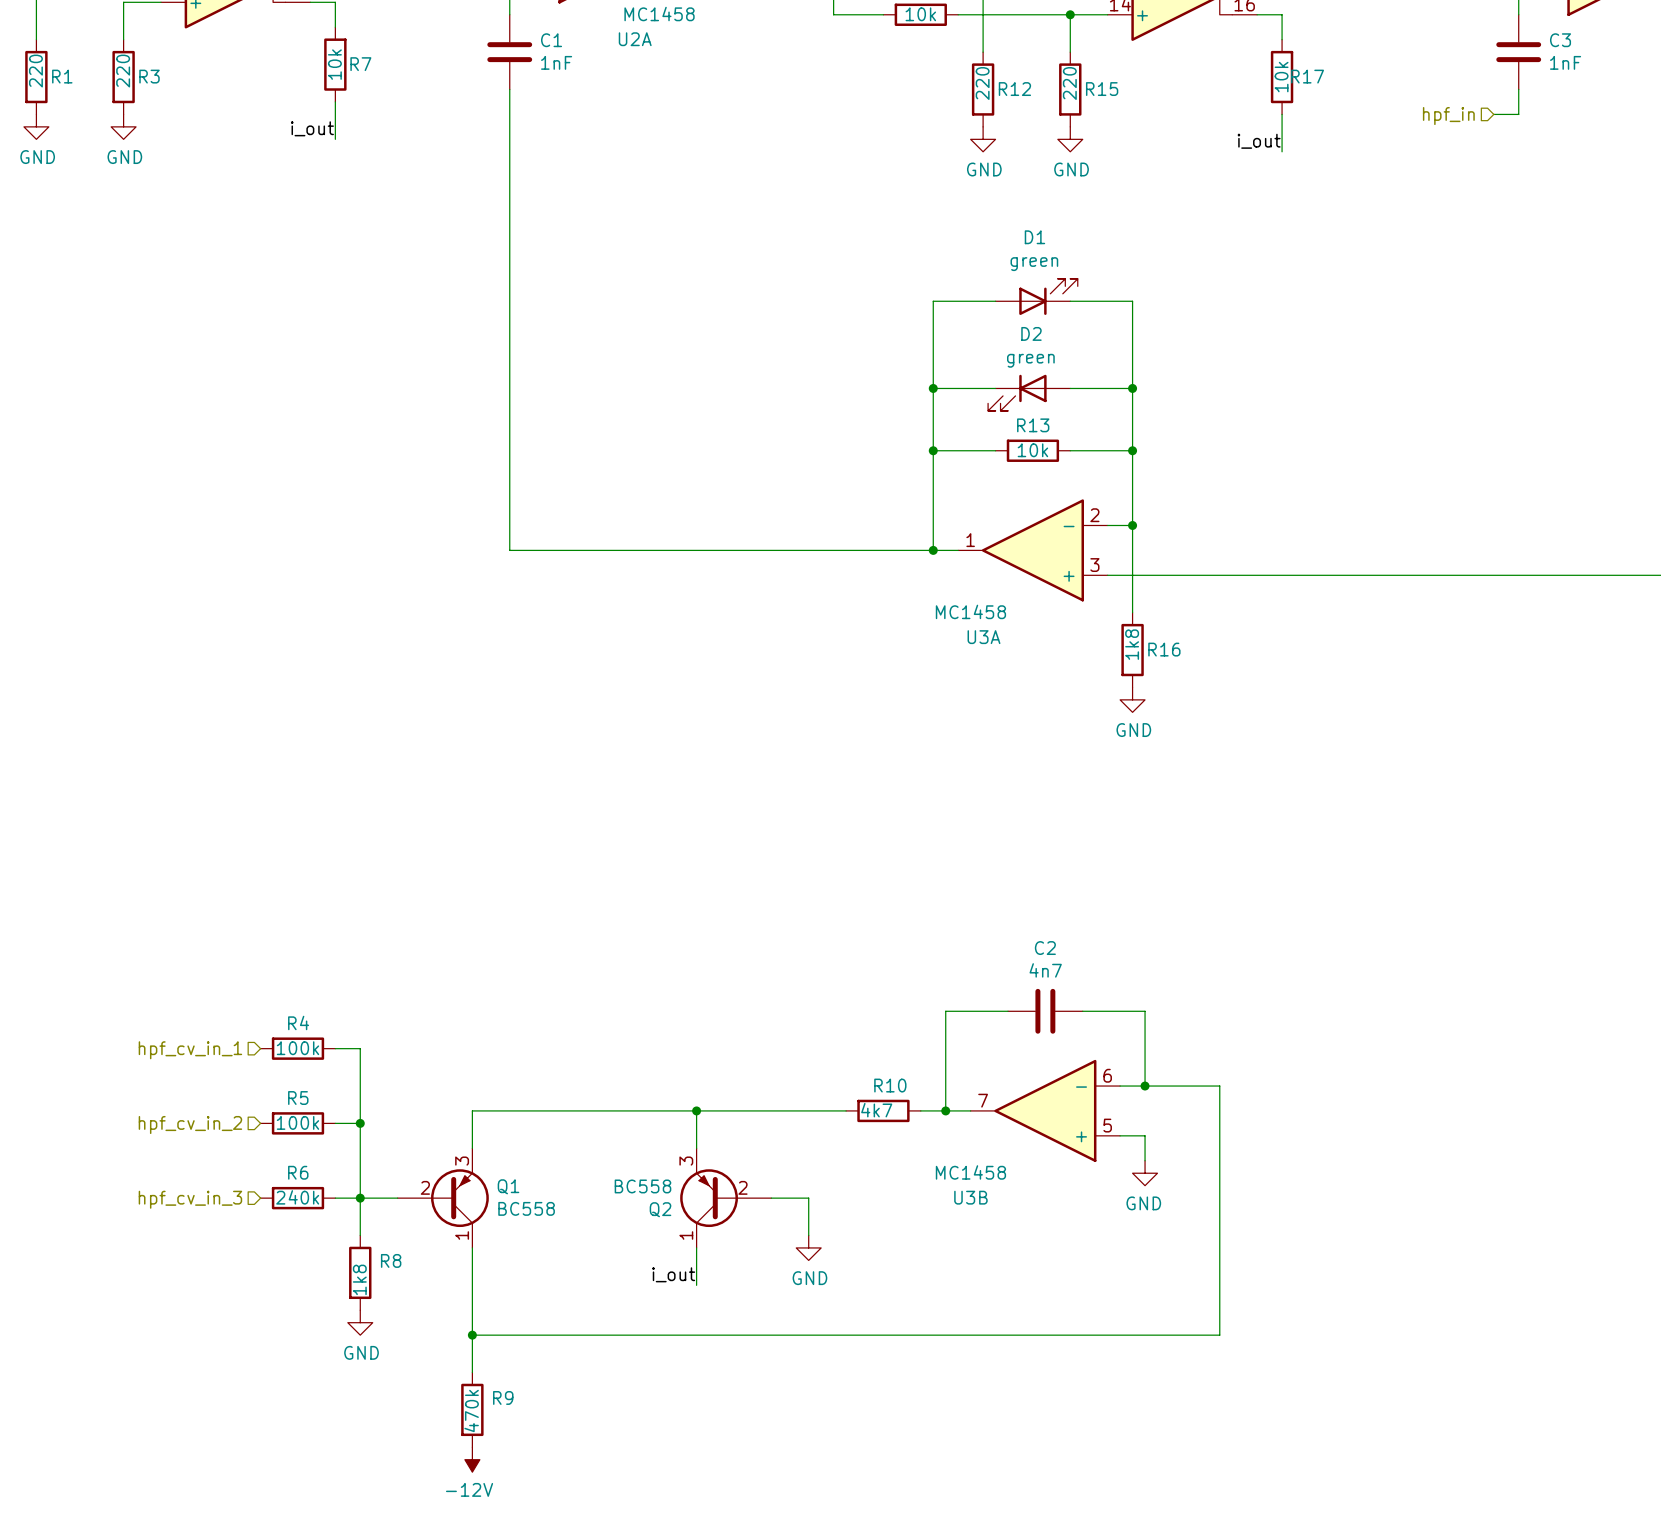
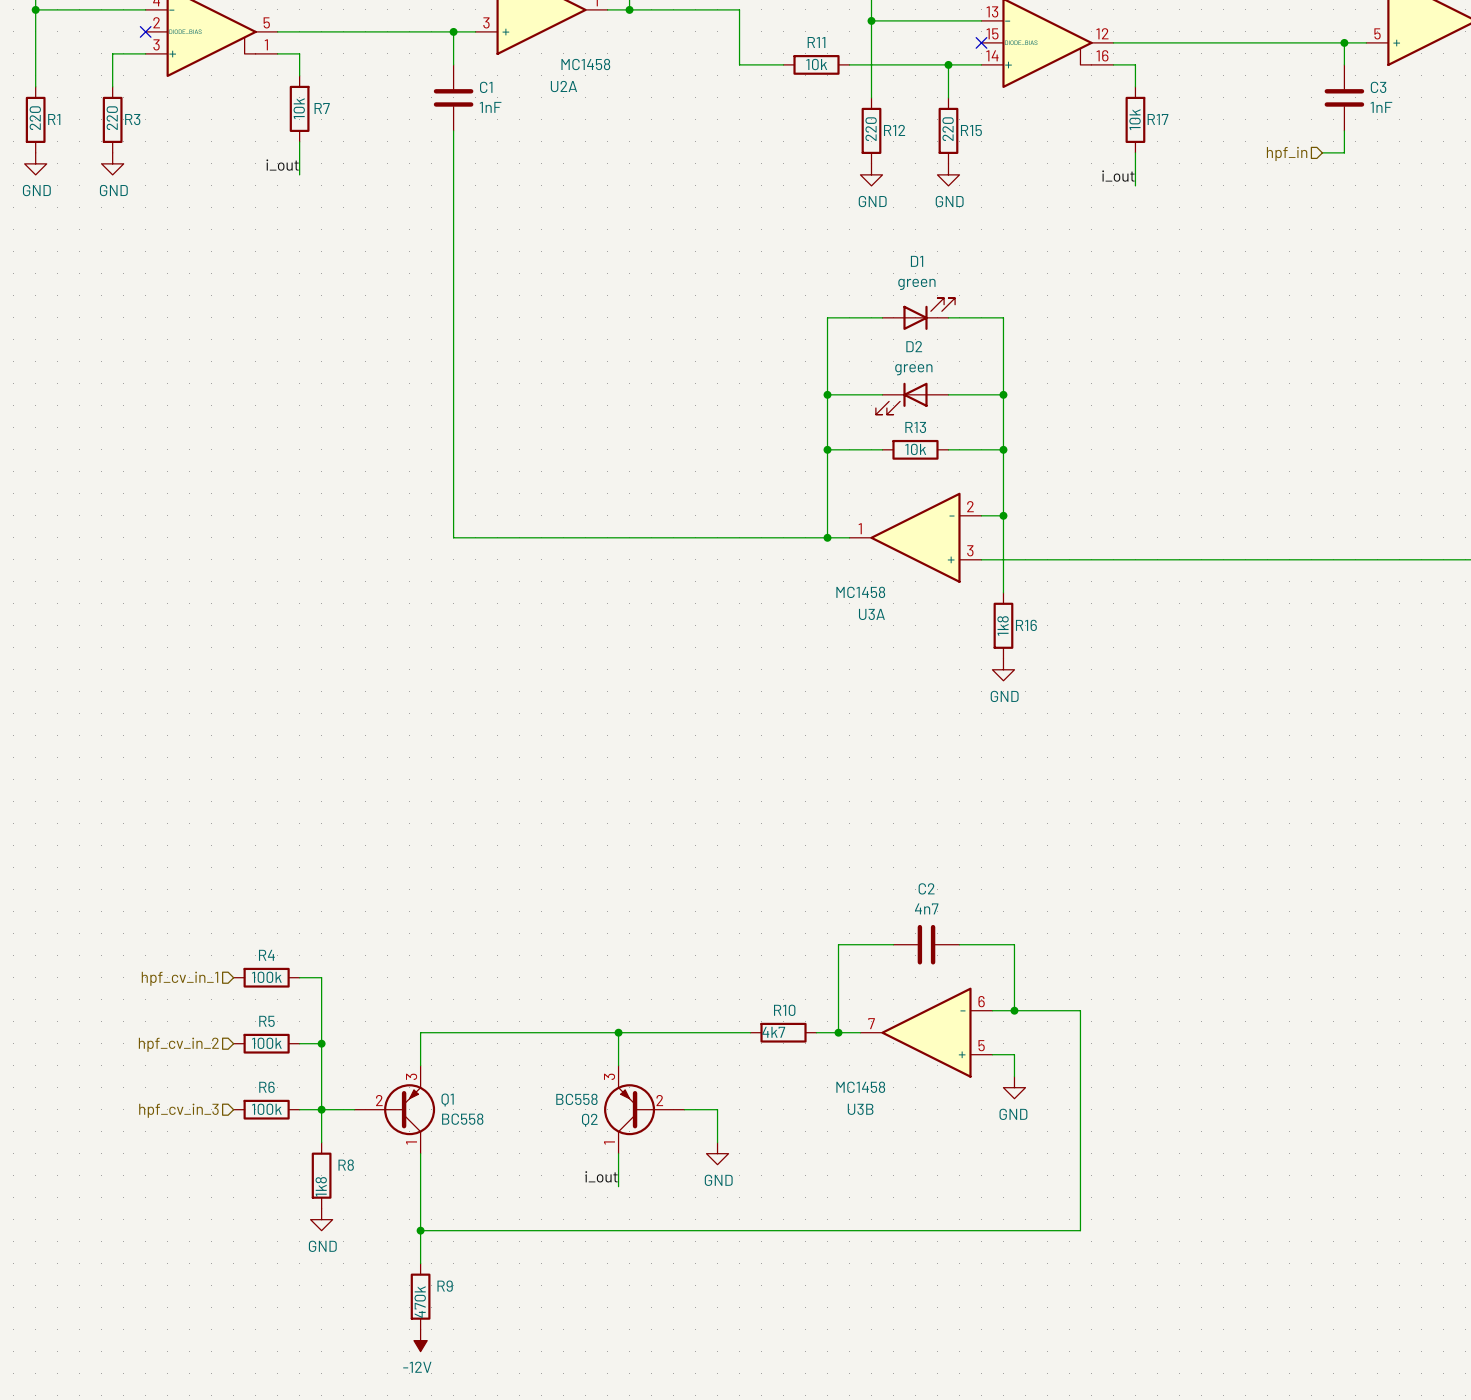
R6 value: 240k (297, 1197) -> 100k (266, 1109)

